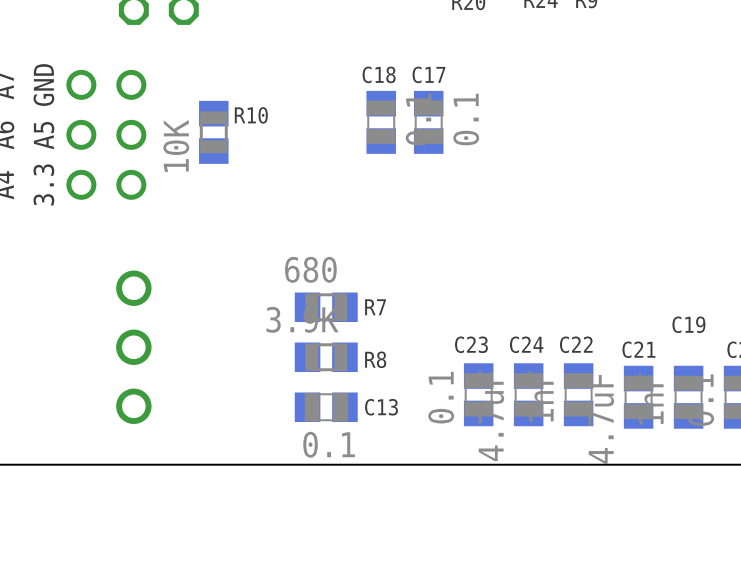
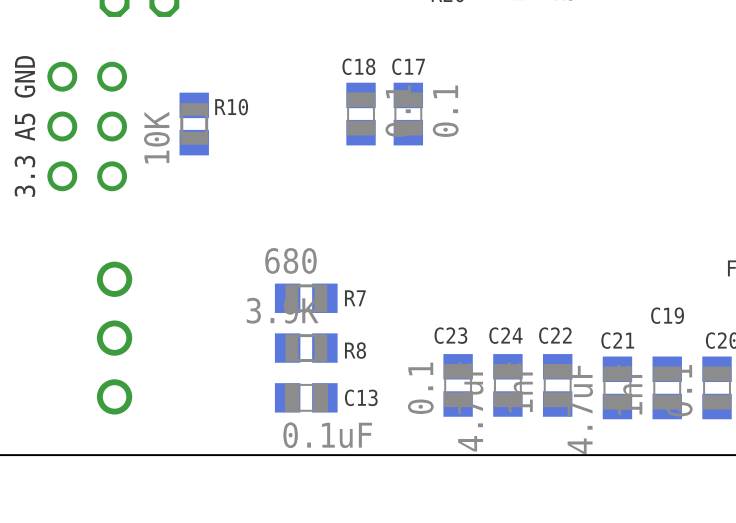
C13 value: 0.1 (329, 444) -> 0.1uF (327, 435)

